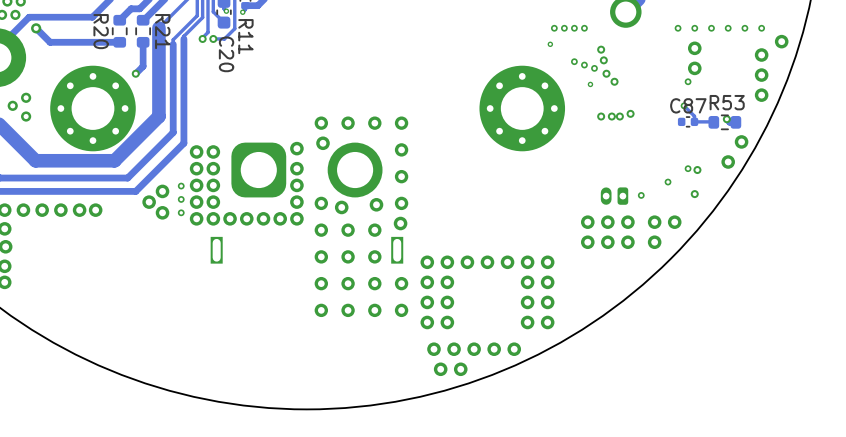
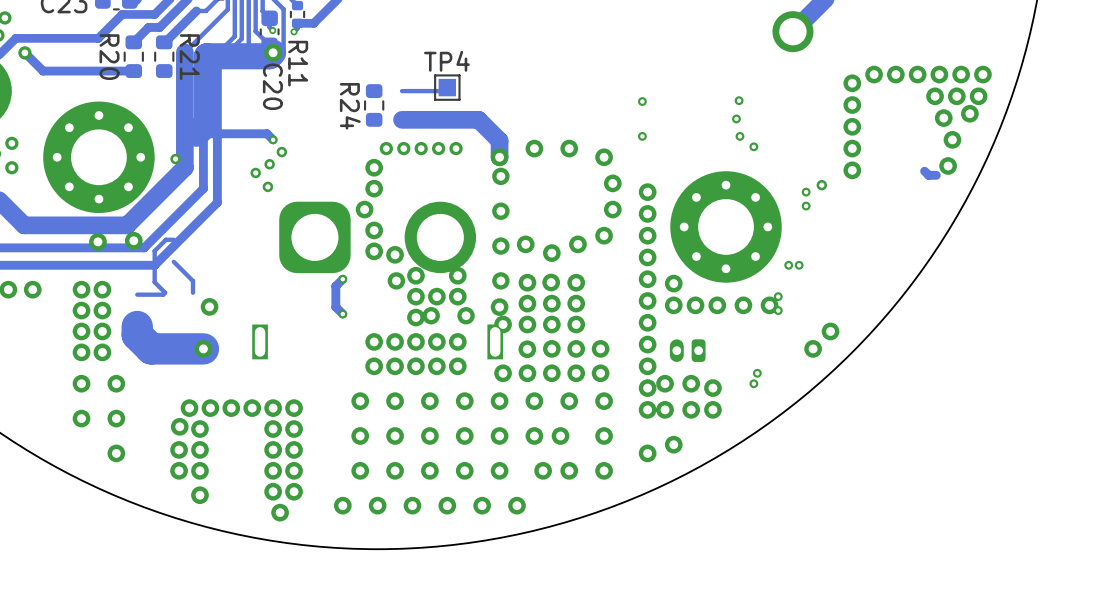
track: none -> (273, 52) (269, 56) (206, 56) (206, 123) (196, 133) (267, 133) (273, 139)
via: none -> (273, 52)
via: (554, 28) -> none
via: (564, 28) -> none
via: (574, 28) -> none
via: (584, 28) -> none
via: (678, 28) -> none
via: (694, 28) -> none
via: (711, 28) -> none
via: (728, 28) -> none
via: (744, 28) -> none
via: (761, 28) -> none
via: (202, 38) -> none
via: (213, 38) -> none
via: (781, 41) -> none
track: (143, 42) (143, 66) (135, 73) -> none
via: (550, 44) -> none
via: none -> (874, 74)
via: none -> (895, 74)
via: none -> (917, 74)
via: none -> (939, 74)
via: none -> (961, 74)
via: none -> (982, 74)
via: (694, 48) -> none
via: (601, 49) -> none
via: none -> (852, 83)
track: none -> (447, 87) (443, 91) (402, 91)
TP4: none -> (447, 87)
via: (761, 55) -> none
via: (603, 60) -> none
via: (574, 61) -> none
via: none -> (935, 96)
via: none -> (956, 96)
via: none -> (978, 96)
via: none -> (642, 101)
R24: none -> (374, 105)
via: (594, 68) -> none
via: none -> (852, 105)
via: (694, 68) -> none
via position: (135, 73) -> (175, 159)
via: (606, 73) -> none
via: none -> (943, 118)
track: none -> (402, 119) (478, 119) (499, 140) (499, 157)
via: none -> (736, 118)
via: (614, 81) -> none
via: (688, 81) -> none
via: (590, 84) -> none
via: none -> (852, 126)
via: none -> (642, 136)
via: none -> (739, 136)
via: none -> (273, 139)
via position: (761, 95) -> (952, 139)
via: none -> (753, 146)
via: none -> (386, 148)
via: none -> (403, 148)
via: none -> (421, 148)
via: none -> (438, 148)
via: none -> (456, 148)
via: none -> (534, 148)
via: none -> (569, 148)
via: none -> (852, 148)
via: none -> (281, 152)
track: (684, 105) (694, 116) (694, 121) (713, 122) -> none
via: (684, 105) -> none
via: none -> (499, 157)
via: none -> (604, 157)
part position: (522, 108) -> (726, 226)
via: none -> (269, 164)
via: (630, 113) -> none
via: none -> (948, 165)
via: none -> (374, 167)
via: (601, 116) -> none
via: (611, 116) -> none
via: (619, 116) -> none
via: none -> (852, 170)
via: (726, 119) -> none
via: none -> (255, 172)
C87: (688, 121) -> none
R53: (724, 122) -> none
via: (321, 123) -> none
via: (348, 123) -> none
via: (374, 123) -> none
via: none -> (612, 183)
via: none -> (821, 185)
via: none -> (267, 186)
via: none -> (374, 188)
via: none -> (647, 192)
via: none -> (806, 192)
via: (741, 141) -> none
via: (322, 143) -> none
via: none -> (806, 206)
via: none -> (612, 209)
via: (196, 151) -> none
via: (213, 151) -> none
via: none -> (647, 213)
via: (728, 161) -> none
via: none -> (374, 230)
via: (196, 168) -> none
via: (213, 168) -> none
via: (296, 168) -> none
via: none -> (604, 235)
via: none -> (647, 235)
via: (688, 168) -> none
via: (697, 170) -> none
track: none -> (173, 239) (165, 239) (154, 251) (154, 282) (165, 292) (163, 294) (137, 294)
via: none -> (133, 240)
via: none -> (97, 241)
via: none -> (525, 244)
via: none -> (577, 244)
via: none -> (374, 251)
via: none -> (551, 253)
via: (668, 182) -> none
via: none -> (395, 254)
via: (196, 185) -> none
via: (213, 185) -> none
via: (296, 185) -> none
via: none -> (647, 257)
via: (181, 186) -> none
track: none -> (173, 261) (193, 281) (193, 292)
via: (162, 191) -> none
via: none -> (788, 265)
via: none -> (799, 265)
via: (694, 194) -> none
via: (641, 195) -> none
part position: (614, 196) -> (687, 350)
via: (181, 199) -> none
via: none -> (415, 275)
via: none -> (457, 275)
via: (149, 202) -> none
via: (196, 202) -> none
via: (213, 202) -> none
track: none -> (342, 279) (335, 286) (335, 307) (342, 314)
via: none -> (342, 279)
via: (296, 202) -> none
via: none -> (647, 279)
via: (376, 204) -> none
via: none -> (527, 282)
via: none -> (551, 282)
via: none -> (576, 282)
via: none -> (673, 283)
via: (341, 207) -> none
via: (60, 210) -> none
via: (162, 212) -> none
via: (181, 212) -> none
via size: [273, 212, 287, 226] -> [338, 309, 348, 319]
via: none -> (415, 296)
via: none -> (436, 296)
via: none -> (457, 296)
via: none -> (778, 296)
via: (196, 218) -> none
via: (213, 218) -> none
via: (230, 218) -> none
via: (246, 218) -> none
via: (263, 218) -> none
via: (296, 218) -> none
via: none -> (647, 300)
via: none -> (527, 303)
via: none -> (551, 303)
via: none -> (576, 303)
via: none -> (673, 305)
via: none -> (695, 305)
via: none -> (717, 305)
via: (627, 222) -> none
via: (654, 222) -> none
via: (674, 222) -> none
via: none -> (209, 306)
via: none -> (81, 310)
via: none -> (102, 310)
via: none -> (778, 310)
via: (321, 230) -> none
via: none -> (415, 317)
via: none -> (647, 322)
via: none -> (503, 324)
via: none -> (527, 324)
via: none -> (551, 324)
via: none -> (576, 324)
track: none -> (137, 326) (137, 334) (151, 348) (203, 348)
via: none -> (81, 331)
via: none -> (102, 331)
via: (587, 242) -> none
via: (607, 242) -> none
via: (627, 242) -> none
via: none -> (374, 341)
via: none -> (395, 341)
via: none -> (415, 341)
via: none -> (436, 341)
via: none -> (457, 341)
via: none -> (647, 344)
via: none -> (203, 348)
via: none -> (527, 349)
via: none -> (551, 348)
via: none -> (576, 348)
via: none -> (600, 348)
via: none -> (813, 348)
via: (321, 256) -> none
via: (348, 256) -> none
via: (374, 256) -> none
via: none -> (81, 352)
via: none -> (102, 352)
via: (427, 262) -> none
via: (447, 262) -> none
via: (467, 262) -> none
via: (487, 262) -> none
via: (507, 262) -> none
via: (527, 262) -> none
via: (547, 262) -> none
via: none -> (374, 366)
via: none -> (395, 366)
via: none -> (415, 366)
via: none -> (436, 366)
via: none -> (457, 366)
via: none -> (647, 366)
via: none -> (503, 373)
via: none -> (527, 373)
via: none -> (551, 373)
via: none -> (576, 373)
via: none -> (600, 373)
via: none -> (757, 373)
via: none -> (81, 383)
via: none -> (116, 383)
via: (427, 282) -> none
via: (447, 282) -> none
via: none -> (753, 383)
via position: (321, 283) -> (395, 401)
via position: (348, 283) -> (429, 401)
via position: (374, 283) -> (464, 401)
via: (401, 283) -> none
via: none -> (647, 388)
via: none -> (712, 388)
via: none -> (360, 401)
via: none -> (499, 401)
via: none -> (534, 401)
via: none -> (569, 401)
via: none -> (604, 401)
via: none -> (189, 408)
via: none -> (210, 408)
via: none -> (231, 408)
via: none -> (252, 408)
via: none -> (273, 408)
via: none -> (294, 408)
via: (427, 302) -> none
via: (447, 302) -> none
via: none -> (647, 409)
via: none -> (712, 409)
via: none -> (81, 418)
via: none -> (116, 418)
via position: (321, 310) -> (395, 435)
via position: (348, 310) -> (429, 435)
via position: (374, 310) -> (464, 435)
via position: (401, 310) -> (499, 435)
via: none -> (179, 426)
via: none -> (199, 429)
via: none -> (273, 429)
via: none -> (294, 429)
via: none -> (360, 435)
via: none -> (604, 435)
via: (527, 322) -> none
via: (547, 322) -> none
via: none -> (673, 444)
via: none -> (179, 449)
via: none -> (199, 449)
via: none -> (273, 449)
via: none -> (294, 449)
via: none -> (116, 453)
via: none -> (647, 453)
via: none -> (179, 470)
via: none -> (199, 470)
via: none -> (273, 470)
via: none -> (294, 470)
via: none -> (360, 470)
via: none -> (395, 470)
via: none -> (429, 470)
via: none -> (464, 470)
via: none -> (499, 470)
via: (474, 349) -> none
via: none -> (604, 470)
via: (494, 349) -> none
via: (514, 349) -> none
via: none -> (273, 491)
via: none -> (294, 491)
via: none -> (199, 495)
via: (440, 369) -> none
via: (460, 369) -> none
via: none -> (342, 505)
via: none -> (377, 505)
via: none -> (412, 505)
via: none -> (447, 505)
via: none -> (482, 505)
via: none -> (516, 505)
via: none -> (280, 512)

